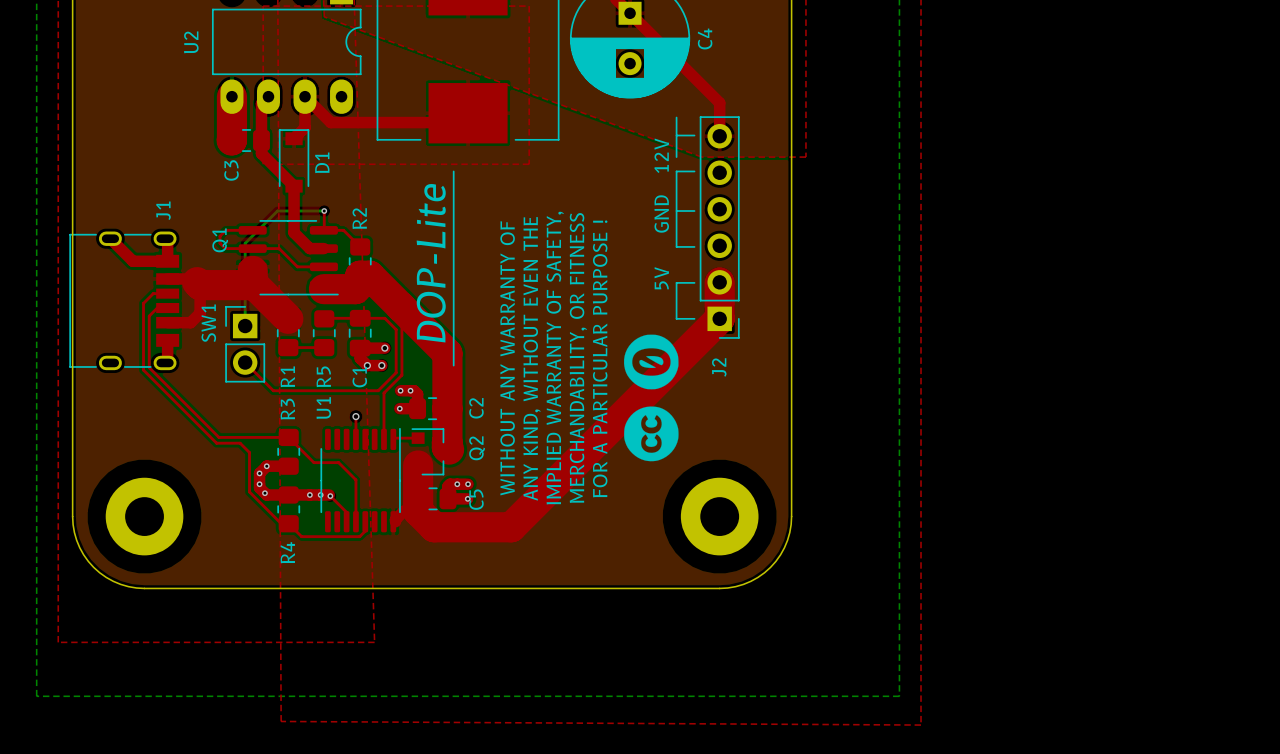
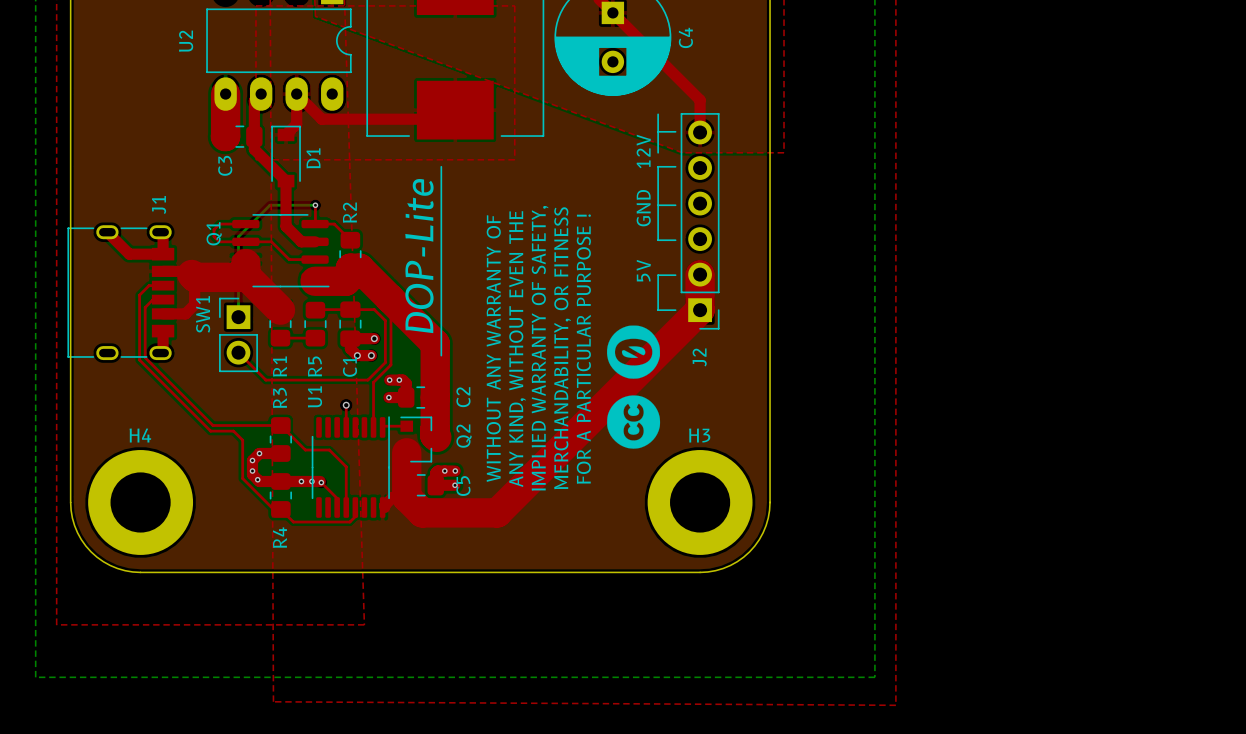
part: (144, 516) -> none
H4: none -> (140, 502)
part: (719, 516) -> none
H3: none -> (700, 502)

